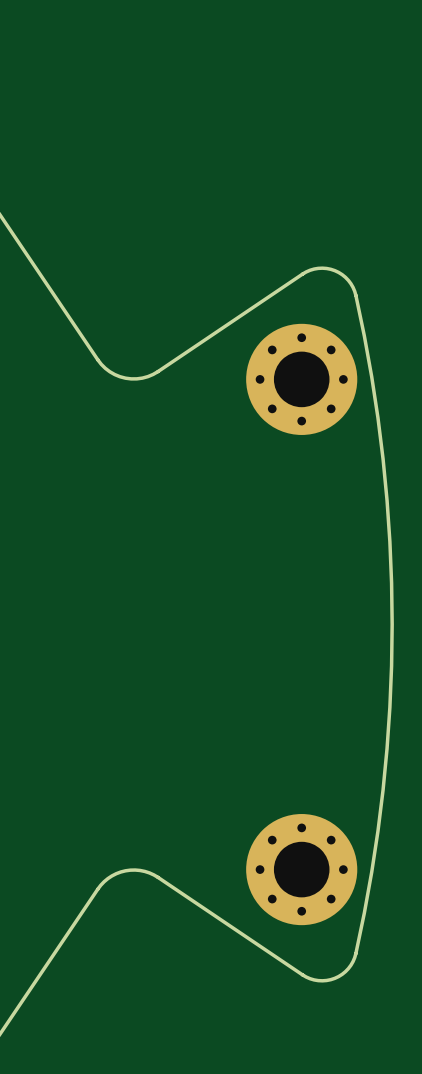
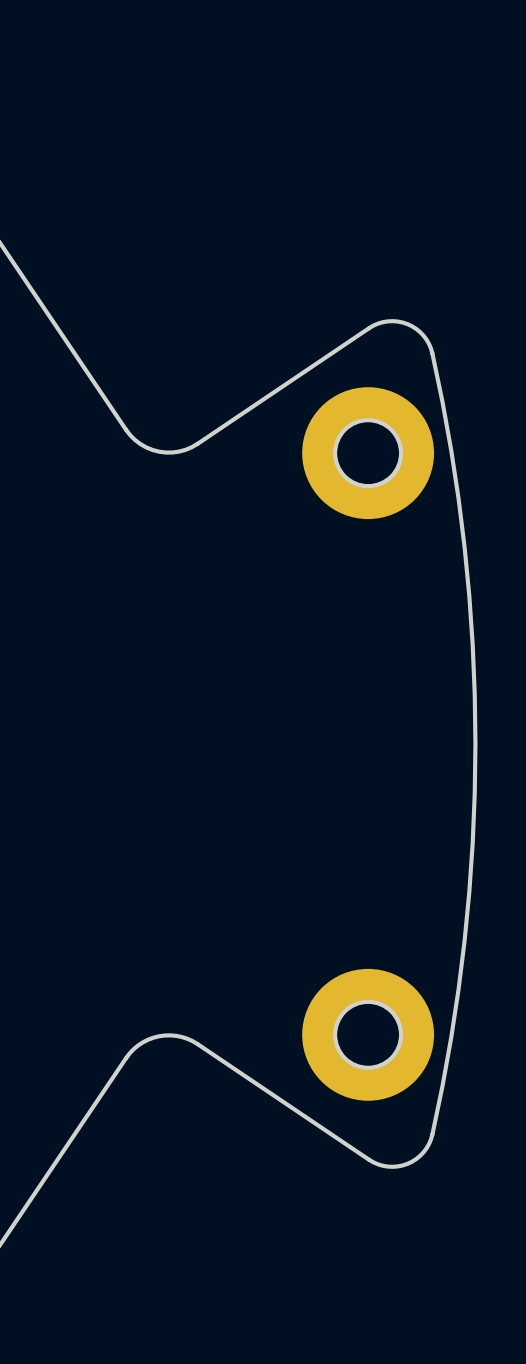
part footprint: [246, 323, 358, 435] -> [302, 387, 435, 520]
round board edge: none -> [333, 418, 404, 489]
part footprint: [246, 814, 358, 926] -> [302, 968, 435, 1101]
round board edge: none -> [333, 999, 404, 1070]

